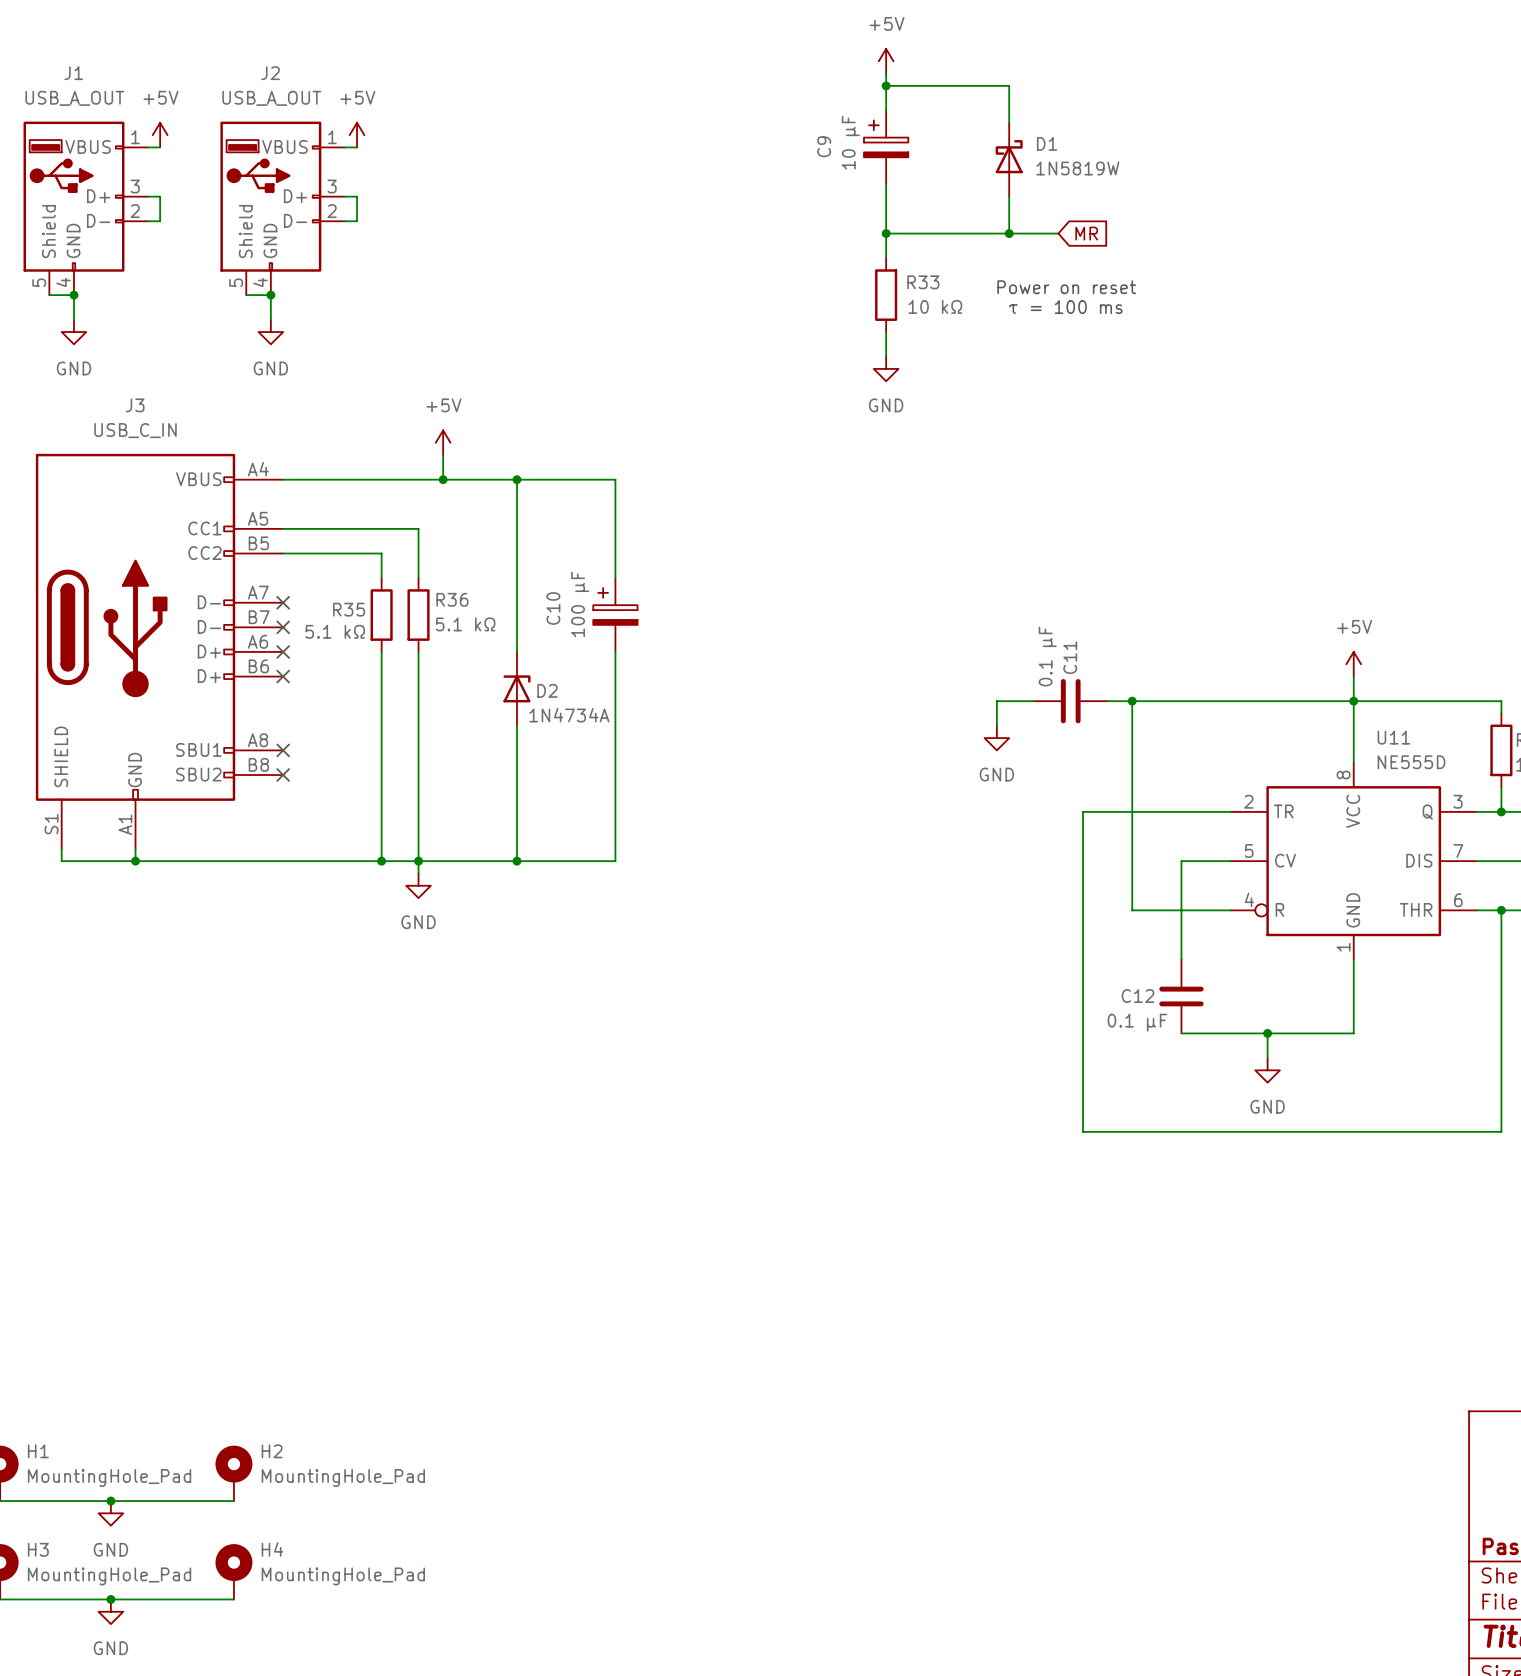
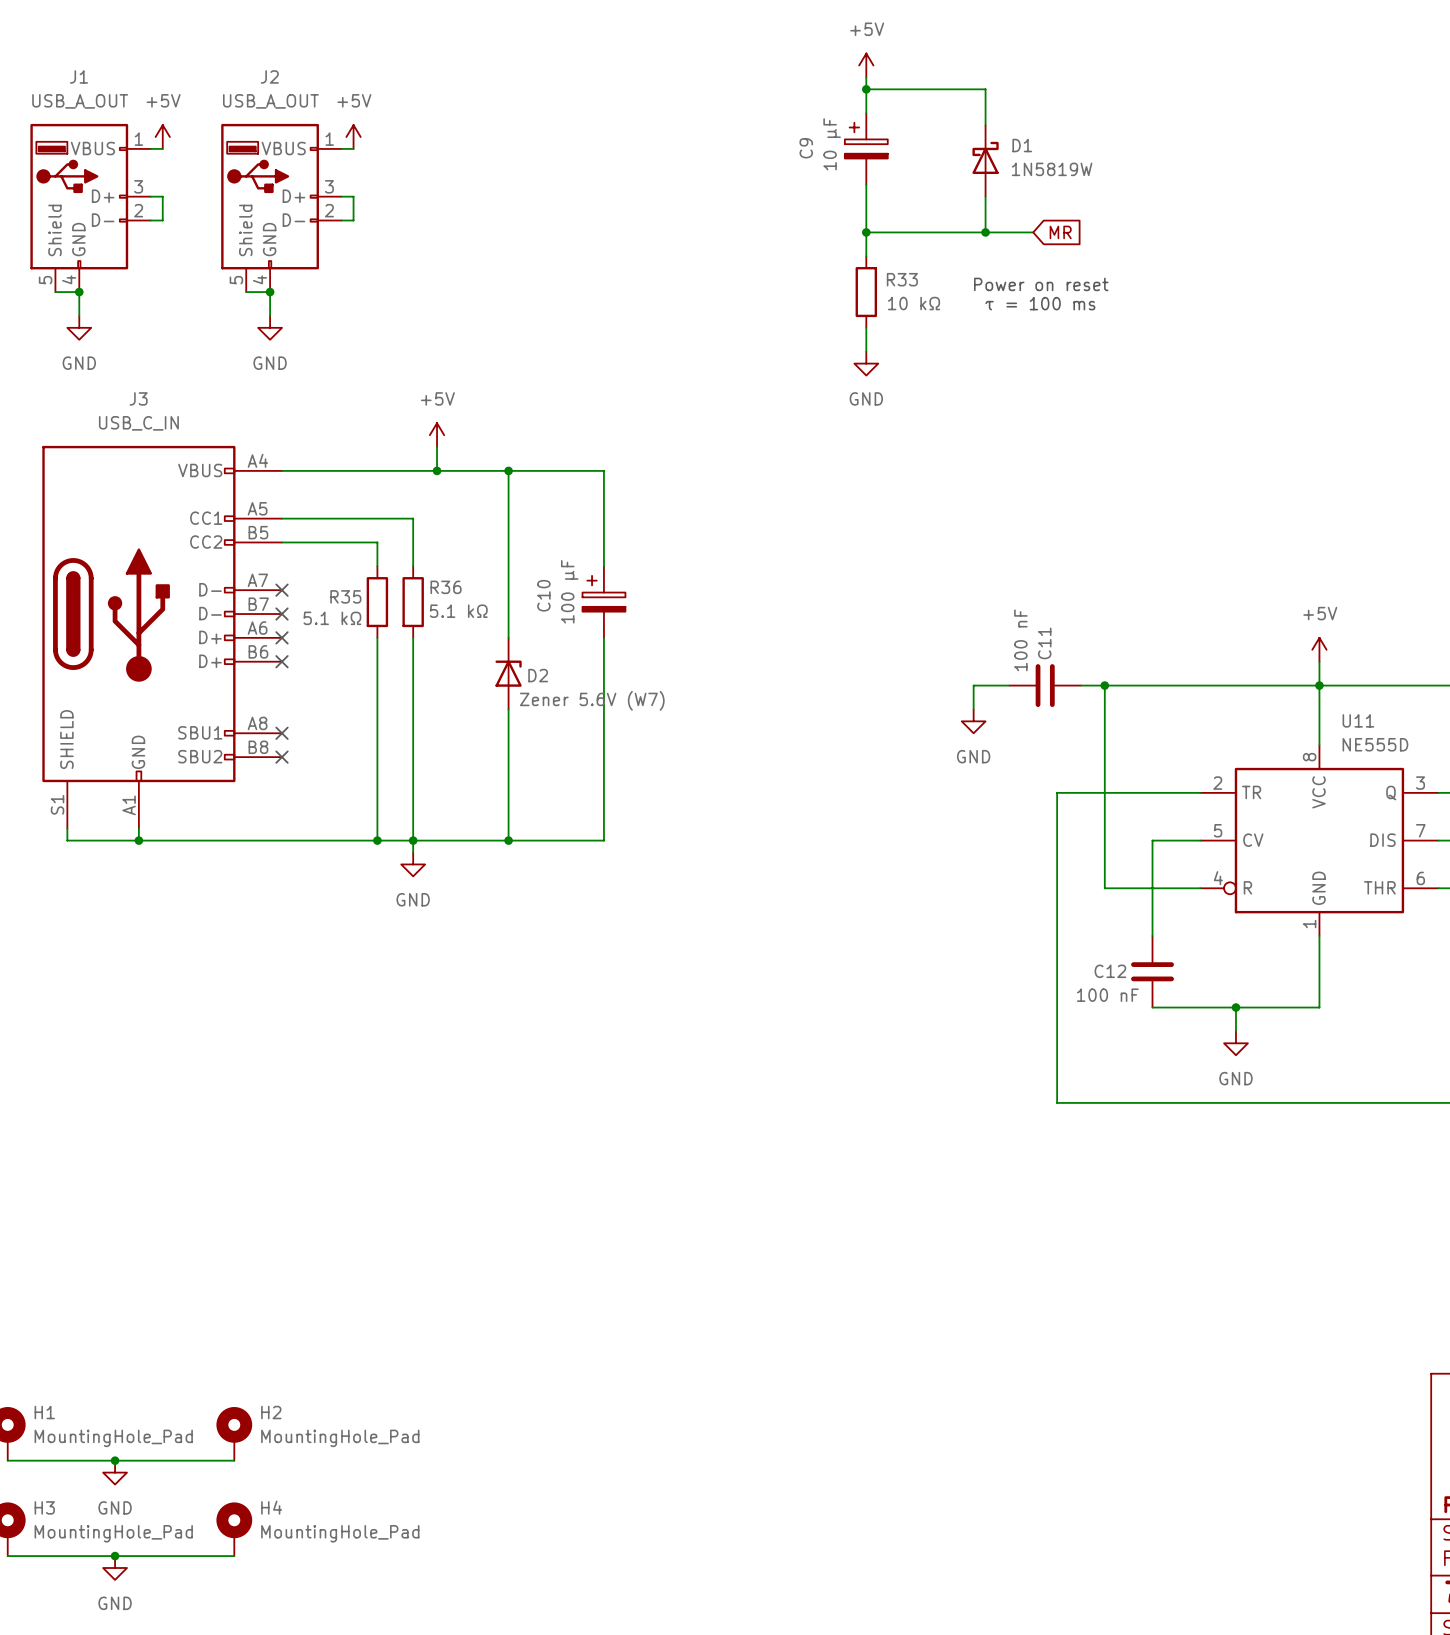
C11 value: 0.1 µF (1047, 656) -> 100 nF (1020, 640)
D2 value: 1N4734A (569, 715) -> Zener 5.6V (W7) (592, 700)
C12 value: 0.1 µF (1137, 1022) -> 100 nF (1107, 995)

